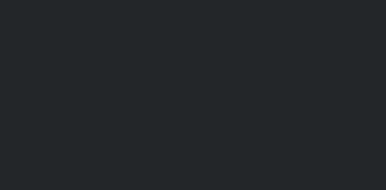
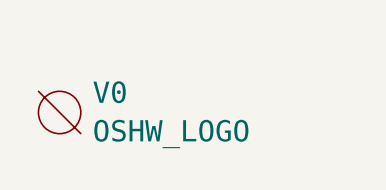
V0: none -> OSHW_LOGO (59, 112)

